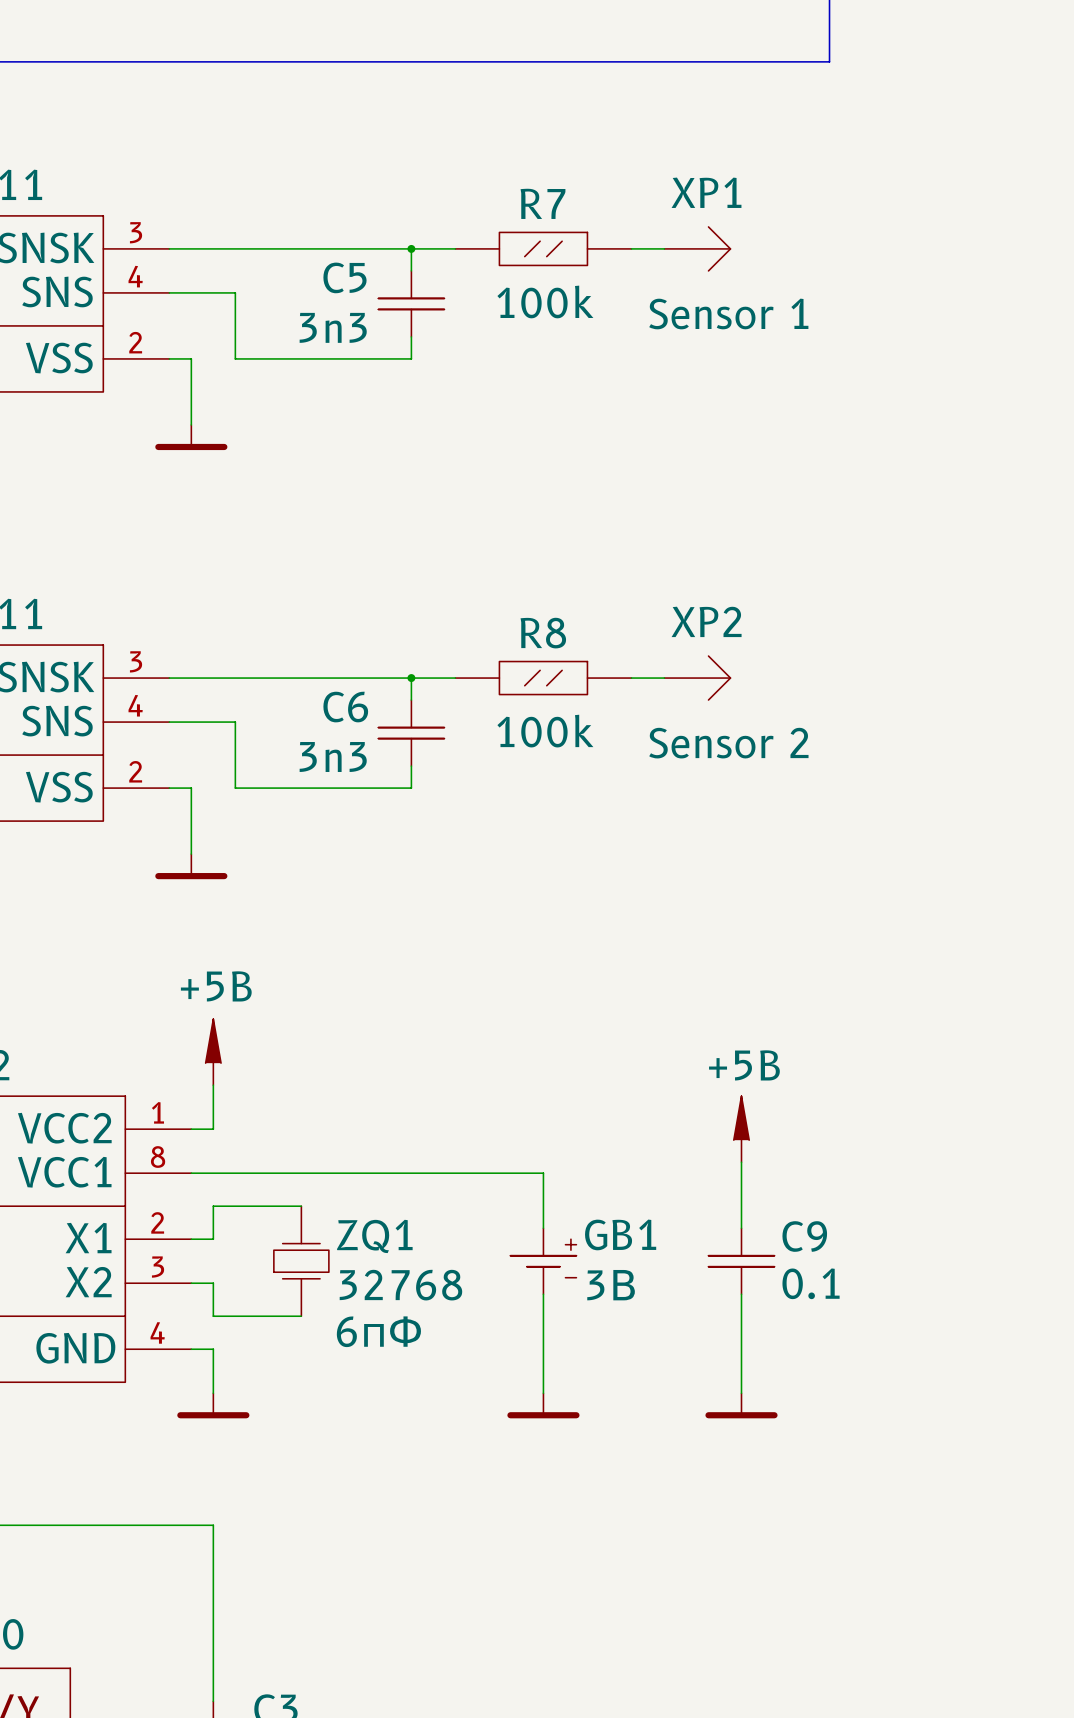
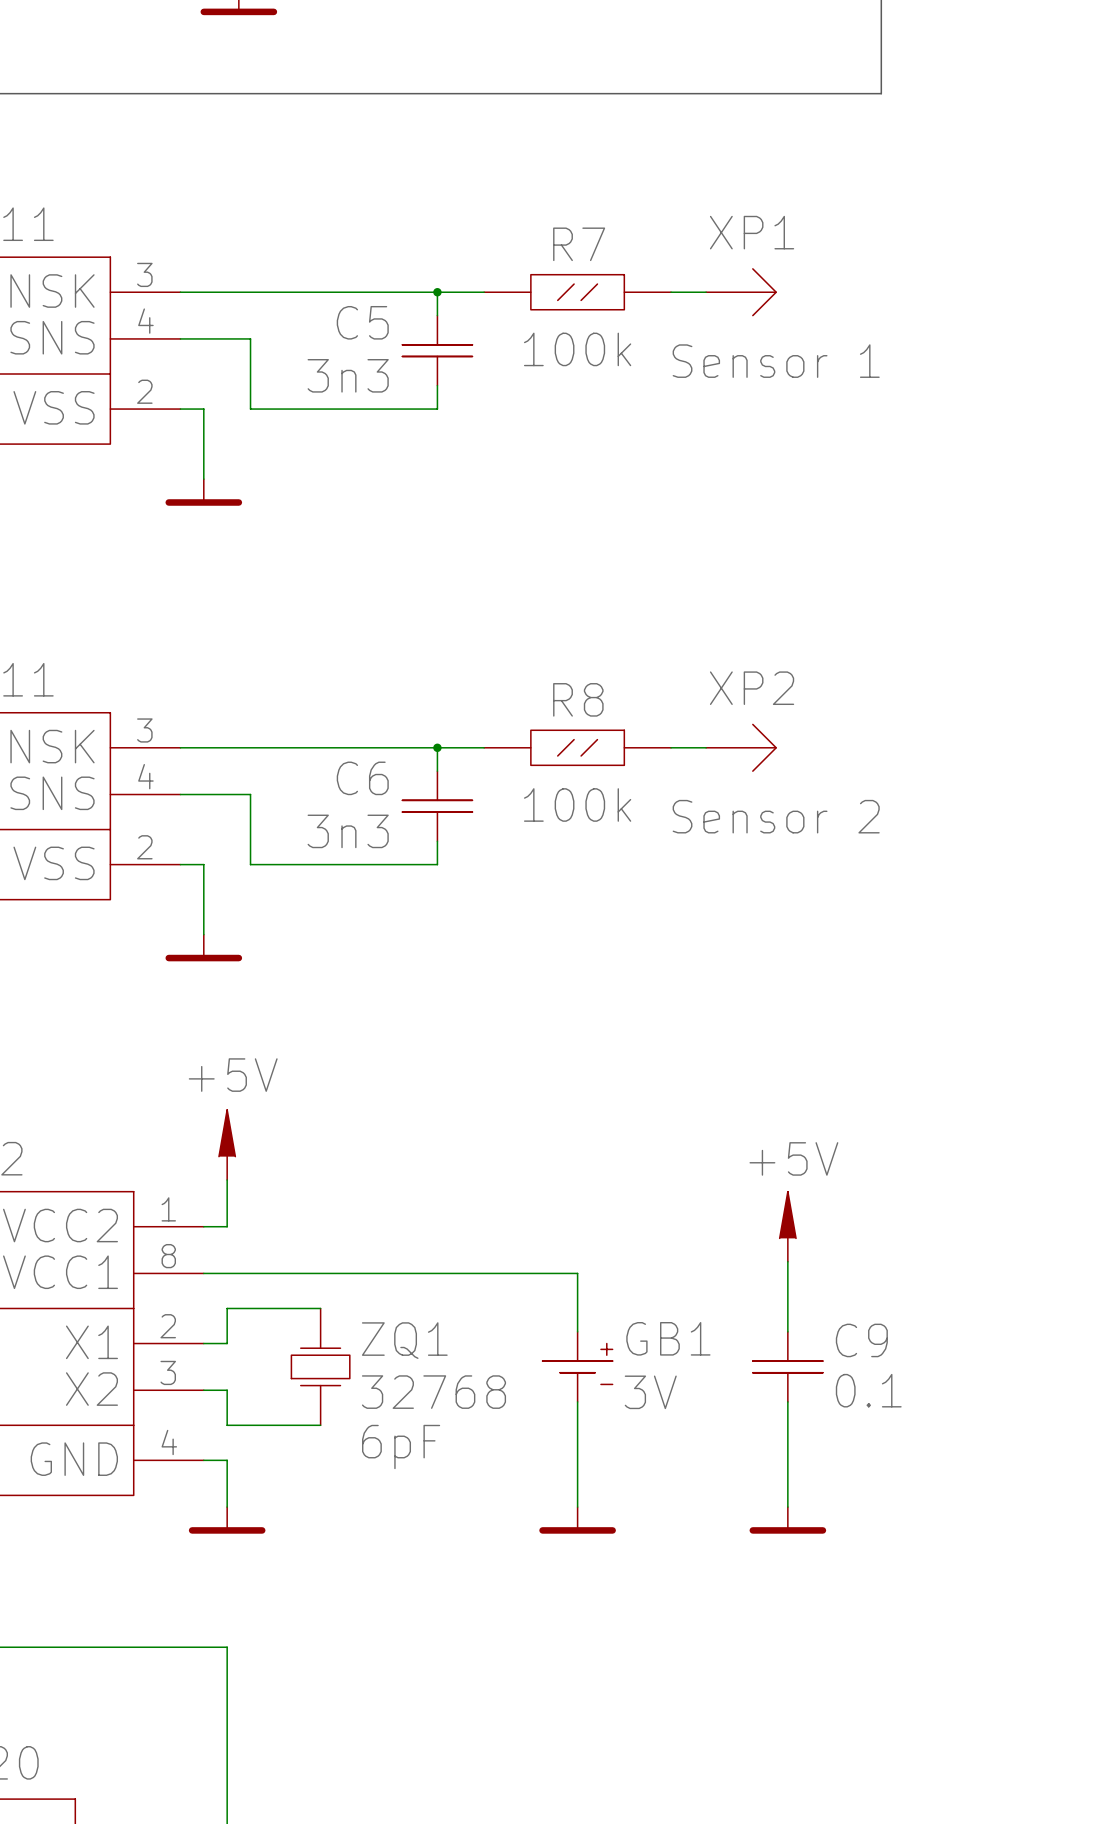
power symbol: +5B (213, 1052) -> +5V (227, 1144)
power symbol: +5B (741, 1129) -> +5V (787, 1226)
GB1 value: 3В (611, 1285) -> 3V (650, 1392)
ZQ1 text: 6пФ (378, 1331) -> 6pF (401, 1446)

